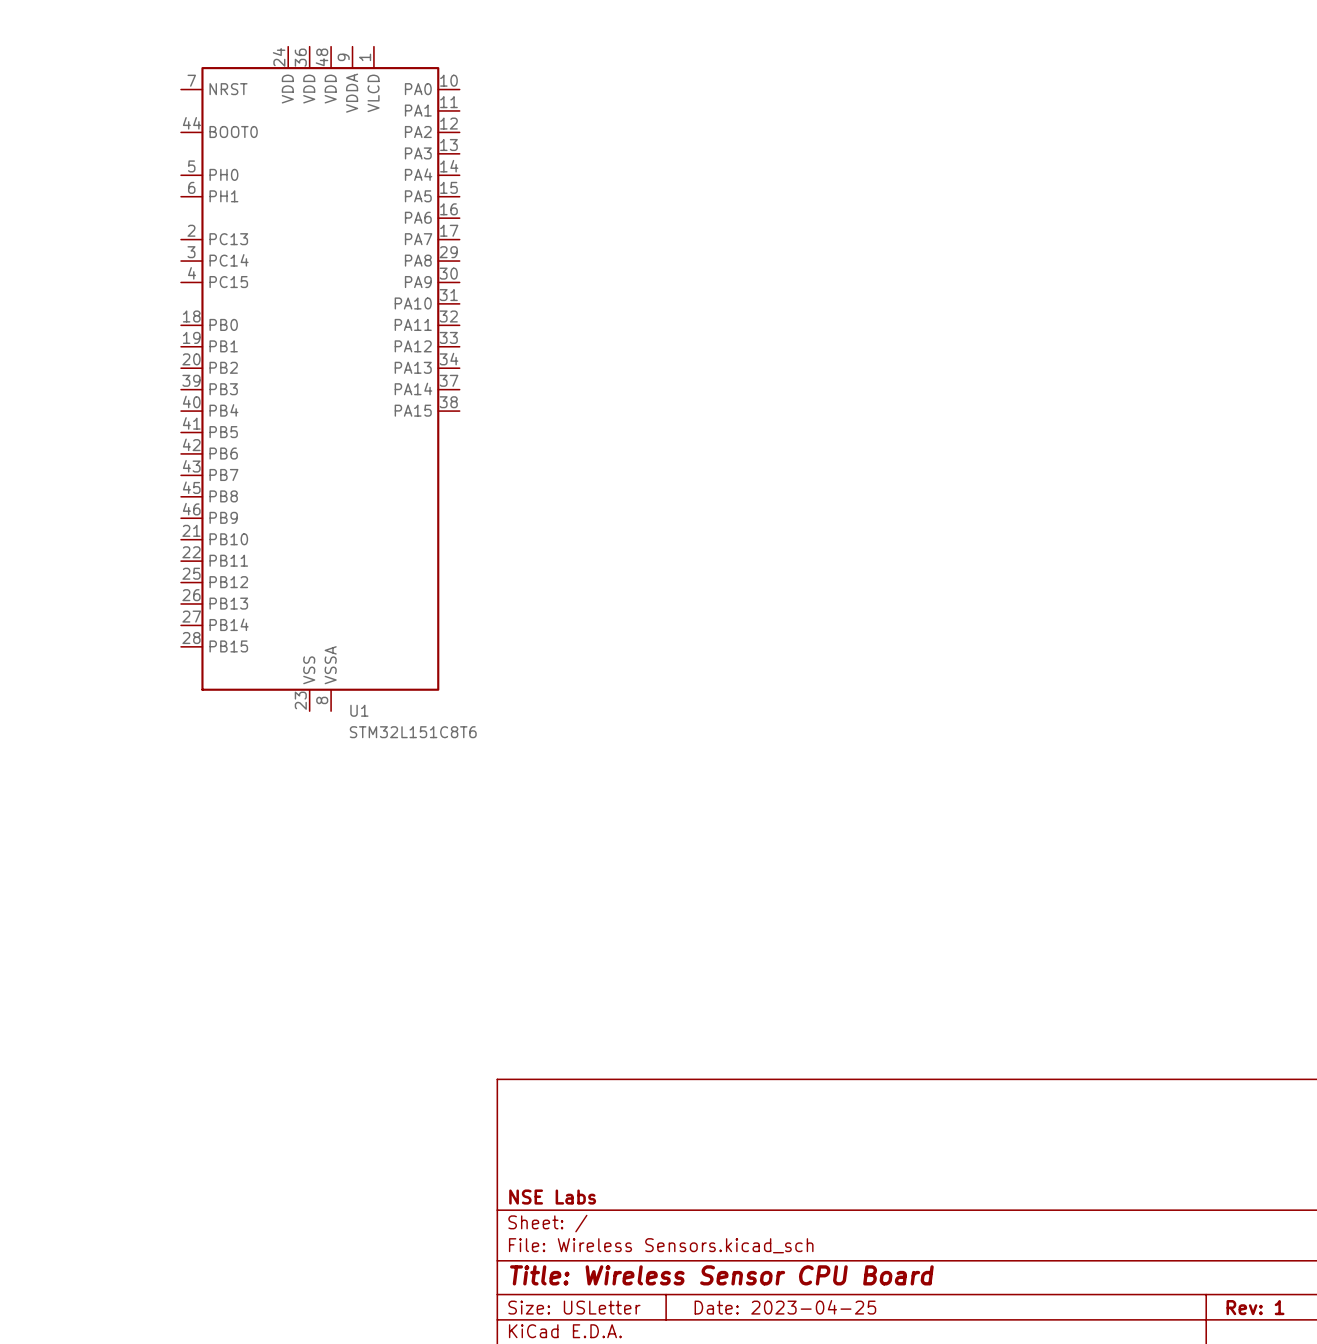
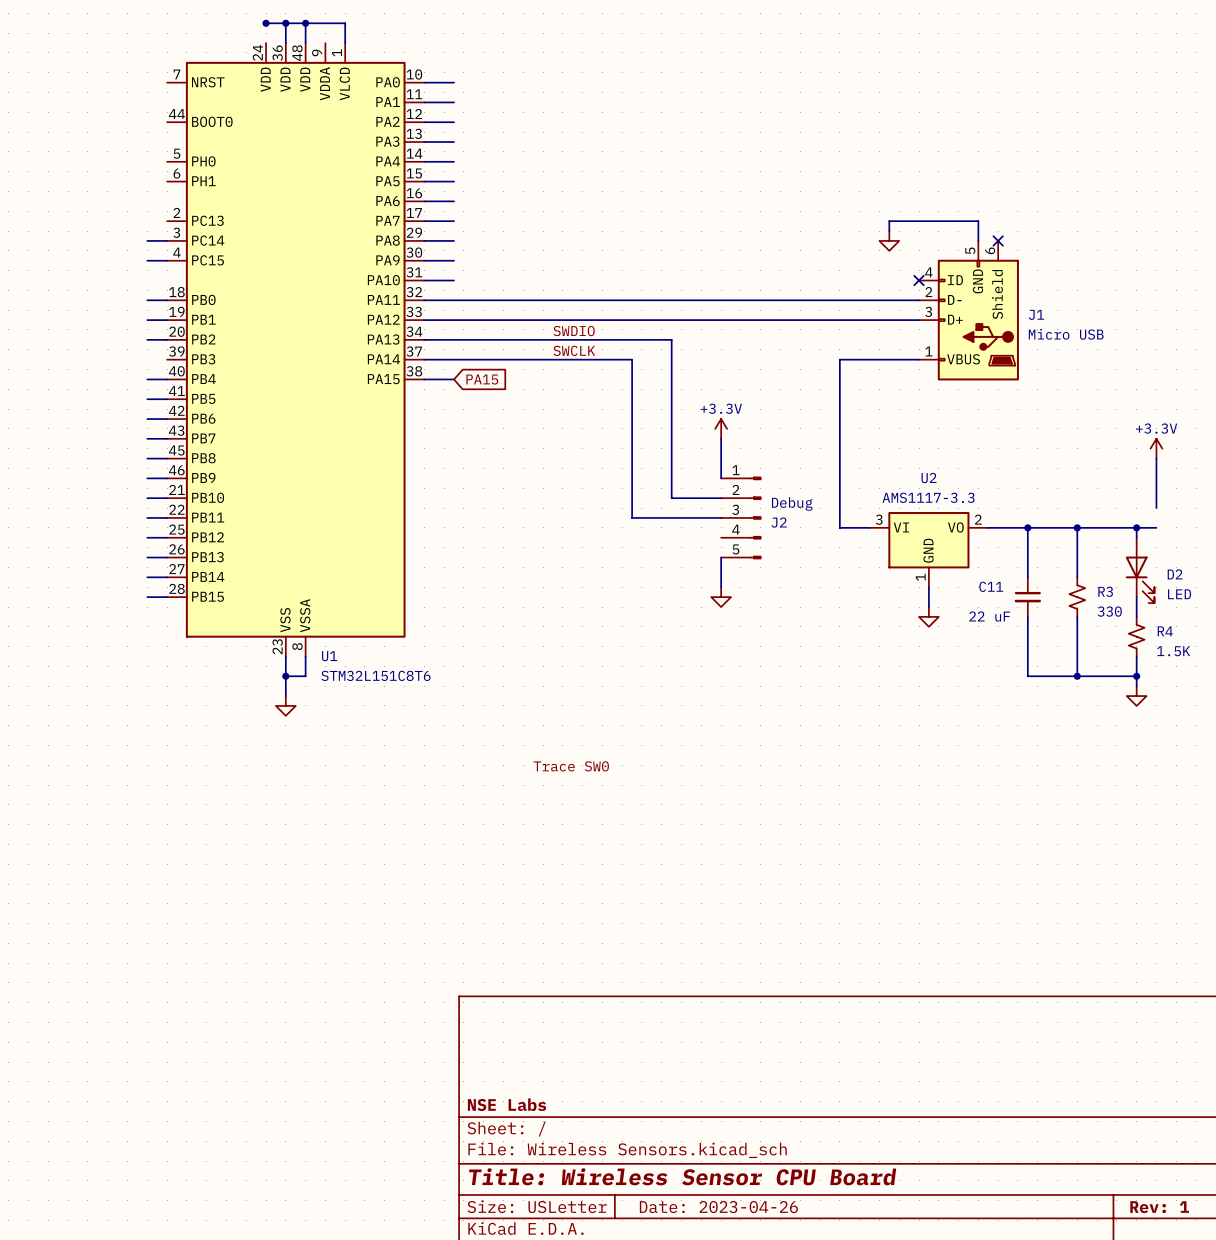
wire: none -> (266, 23) (345, 23) (345, 43)
junction: none -> (266, 23)
wire: none -> (285, 23) (285, 43)
junction: none -> (285, 23)
wire: none -> (305, 23) (305, 43)
junction: none -> (305, 23)
wire: none -> (424, 82) (454, 82)
wire: none -> (424, 102) (454, 102)
wire: none -> (424, 122) (454, 122)
wire: none -> (424, 142) (454, 142)
wire: none -> (424, 161) (454, 161)
wire: none -> (424, 181) (454, 181)
wire: none -> (424, 201) (454, 201)
wire: none -> (424, 221) (454, 221)
wire: none -> (889, 231) (889, 221) (978, 221) (978, 240)
wire: none -> (147, 240) (167, 240)
wire: none -> (424, 240) (454, 240)
power symbol: none -> (889, 240)
no-connect mark: none -> (998, 240)
wire: none -> (147, 260) (167, 260)
wire: none -> (424, 260) (454, 260)
wire: none -> (424, 280) (454, 280)
no-connect mark: none -> (919, 280)
wire: none -> (147, 300) (167, 300)
wire: none -> (424, 300) (919, 300)
J1: none -> Micro USB (968, 310)
wire: none -> (147, 320) (167, 320)
wire: none -> (424, 320) (919, 320)
label: none -> SWDIO (574, 331)
wire: none -> (147, 339) (167, 339)
wire: none -> (424, 339) (671, 339) (671, 498) (721, 498)
label: none -> SWCLK (574, 350)
wire: none -> (424, 359) (632, 359) (632, 517) (721, 517)
wire: none -> (919, 359) (839, 359) (839, 527) (869, 527)
wire: none -> (147, 379) (167, 379)
wire: none -> (424, 379) (454, 379)
global label: none -> PA15 (482, 379)
wire: none -> (147, 399) (167, 399)
wire: none -> (147, 419) (167, 419)
power symbol: none -> +3.3V (721, 428)
wire: none -> (147, 438) (167, 438)
wire: none -> (721, 438) (721, 478)
power symbol: none -> +3.3V (1156, 448)
wire: none -> (147, 458) (167, 458)
wire: none -> (1156, 458) (1156, 508)
wire: none -> (147, 478) (167, 478)
wire: none -> (147, 498) (167, 498)
wire: none -> (147, 517) (167, 517)
J2: none -> Debug (741, 517)
wire: none -> (988, 527) (1156, 527)
wire: none -> (1027, 527) (1027, 577)
junction: none -> (1027, 527)
wire: none -> (1077, 527) (1077, 577)
junction: none -> (1077, 527)
wire: none -> (1136, 527) (1136, 537)
junction: none -> (1136, 527)
wire: none -> (147, 537) (167, 537)
U2: none -> AMS1117-3.3 (928, 549)
wire: none -> (147, 557) (167, 557)
wire: none -> (721, 557) (721, 587)
D2: none -> LED (1140, 570)
wire: none -> (147, 577) (167, 577)
wire: none -> (928, 587) (928, 607)
wire: none -> (147, 597) (167, 597)
power symbol: none -> (721, 597)
C11: none -> 22 uF (1027, 597)
R3: none -> 330 (1077, 597)
wire: none -> (1136, 597) (1136, 616)
power symbol: none -> (928, 616)
wire: none -> (1027, 616) (1027, 676) (1136, 676)
wire: none -> (1077, 616) (1077, 676)
R4: none -> 1.5K (1136, 636)
wire: none -> (285, 656) (285, 696)
wire: none -> (305, 656) (305, 676) (285, 676)
wire: none -> (1136, 656) (1136, 686)
junction: none -> (285, 676)
junction: none -> (1077, 676)
junction: none -> (1136, 676)
power symbol: none -> (1136, 696)
power symbol: none -> (285, 705)
label: none -> Trace SW0 (571, 766)
title block: Date: 2023-04-25 (785, 1307) -> Date: 2023-04-26 (718, 1207)

